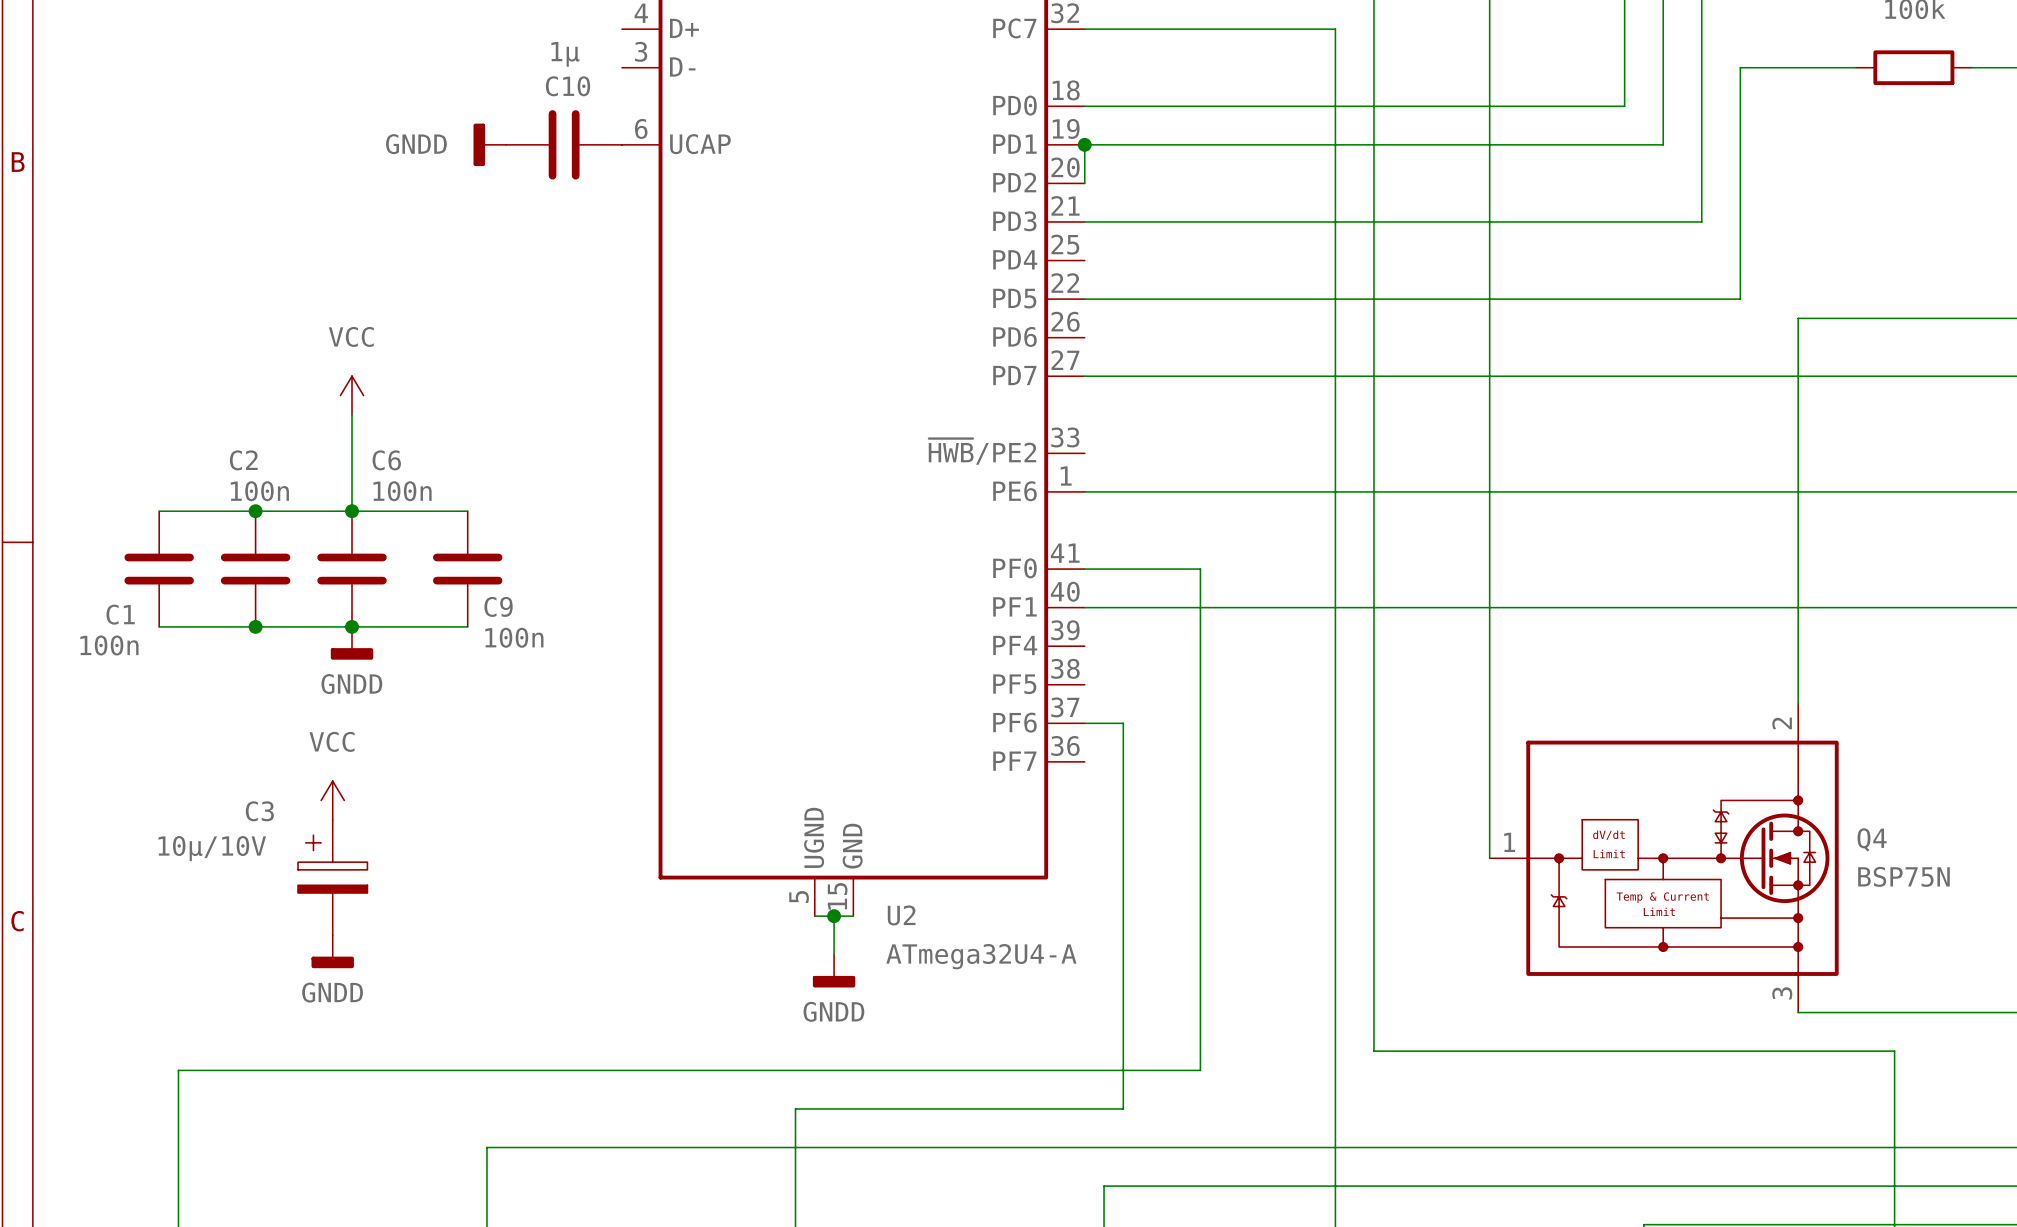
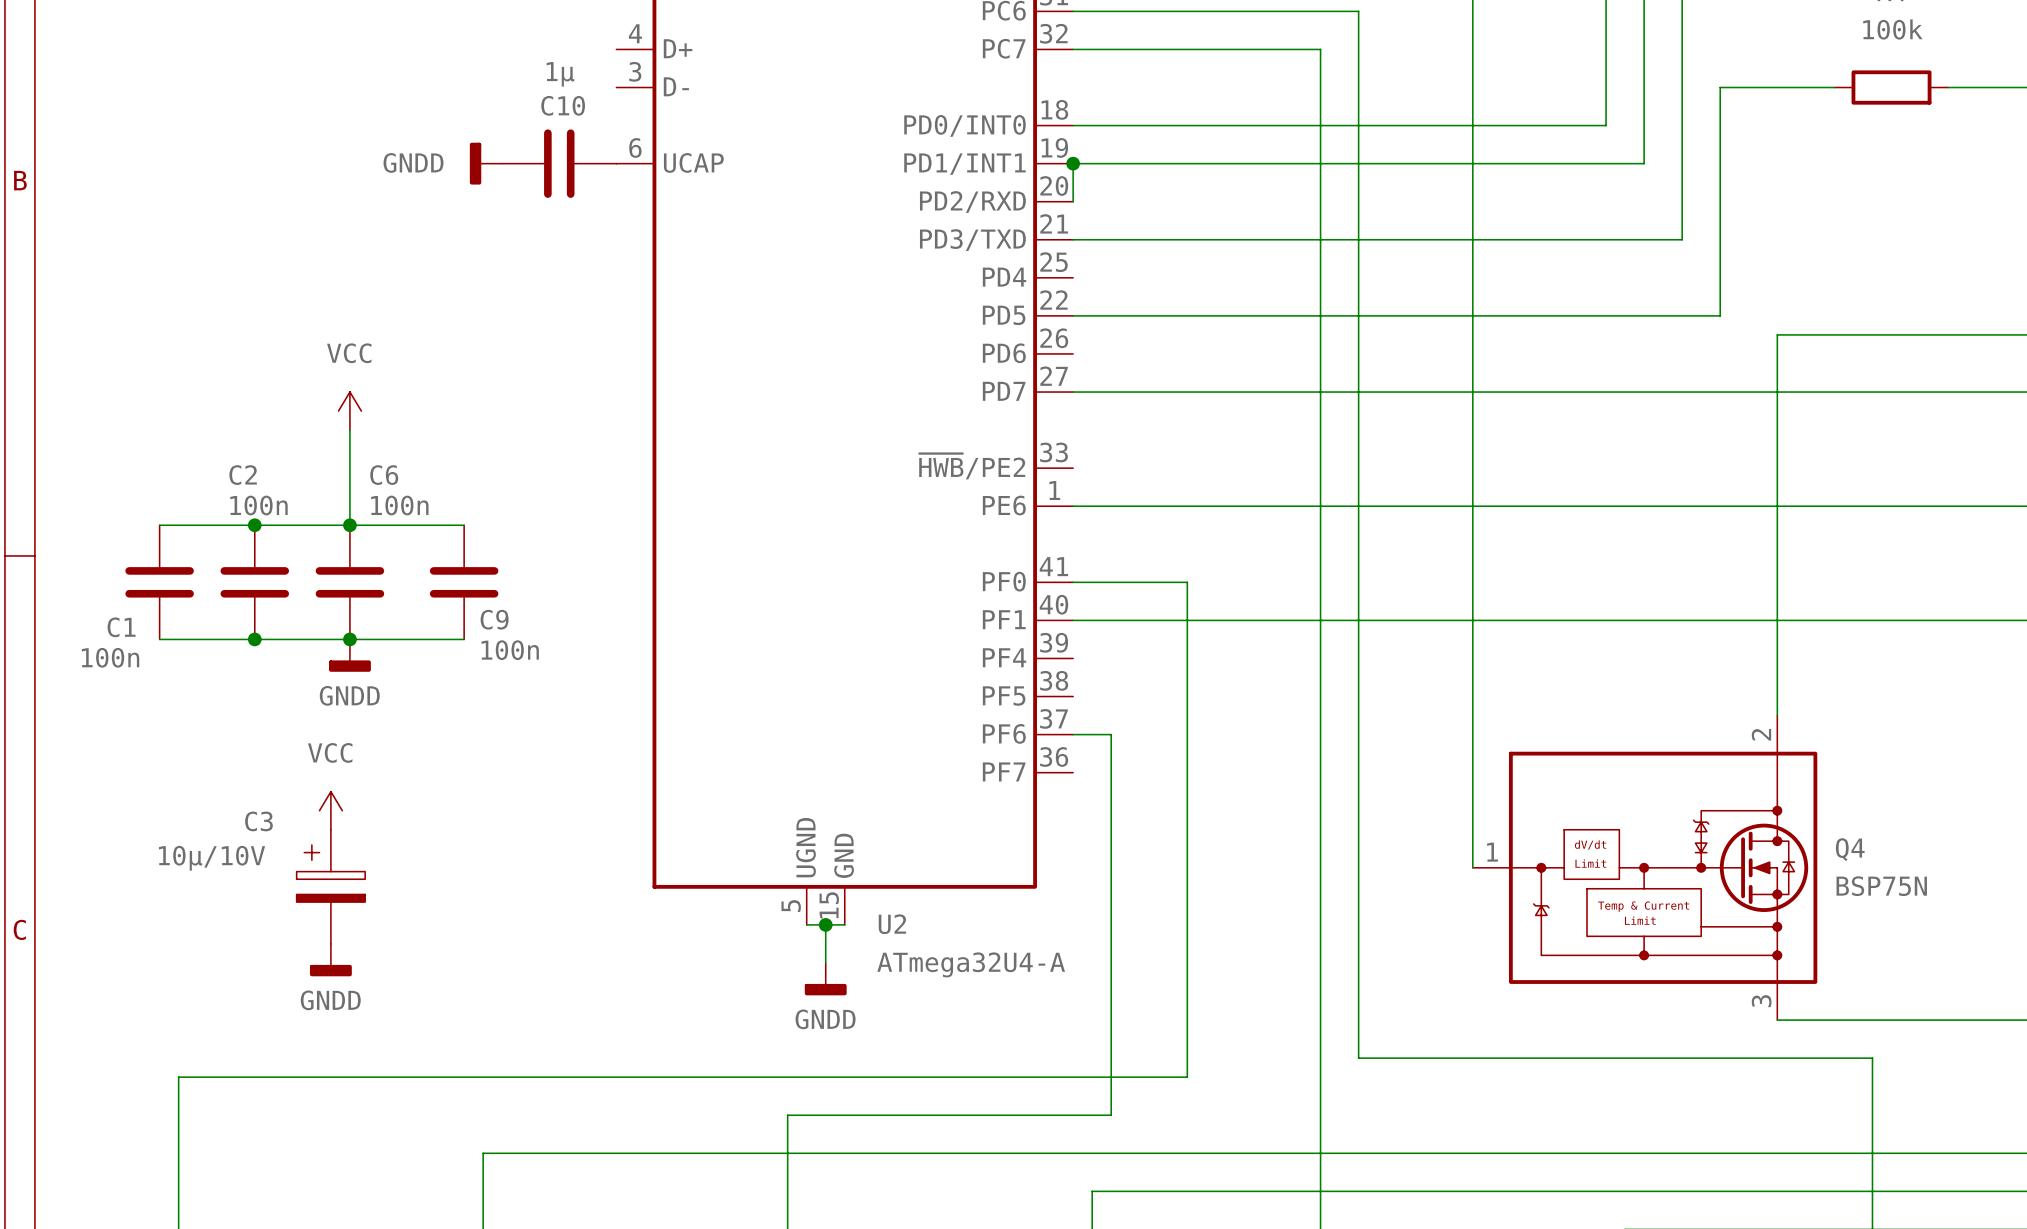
U2 pin name: PD0 (1014, 105) -> PD0/INT0 (965, 125)
U2 pin name: PD1 (1014, 144) -> PD1/INT1 (964, 164)
U2 pin name: PD2 (1014, 182) -> PD2/RXD (972, 202)
U2 pin name: PD3 (1014, 221) -> PD3/TXD (972, 240)

